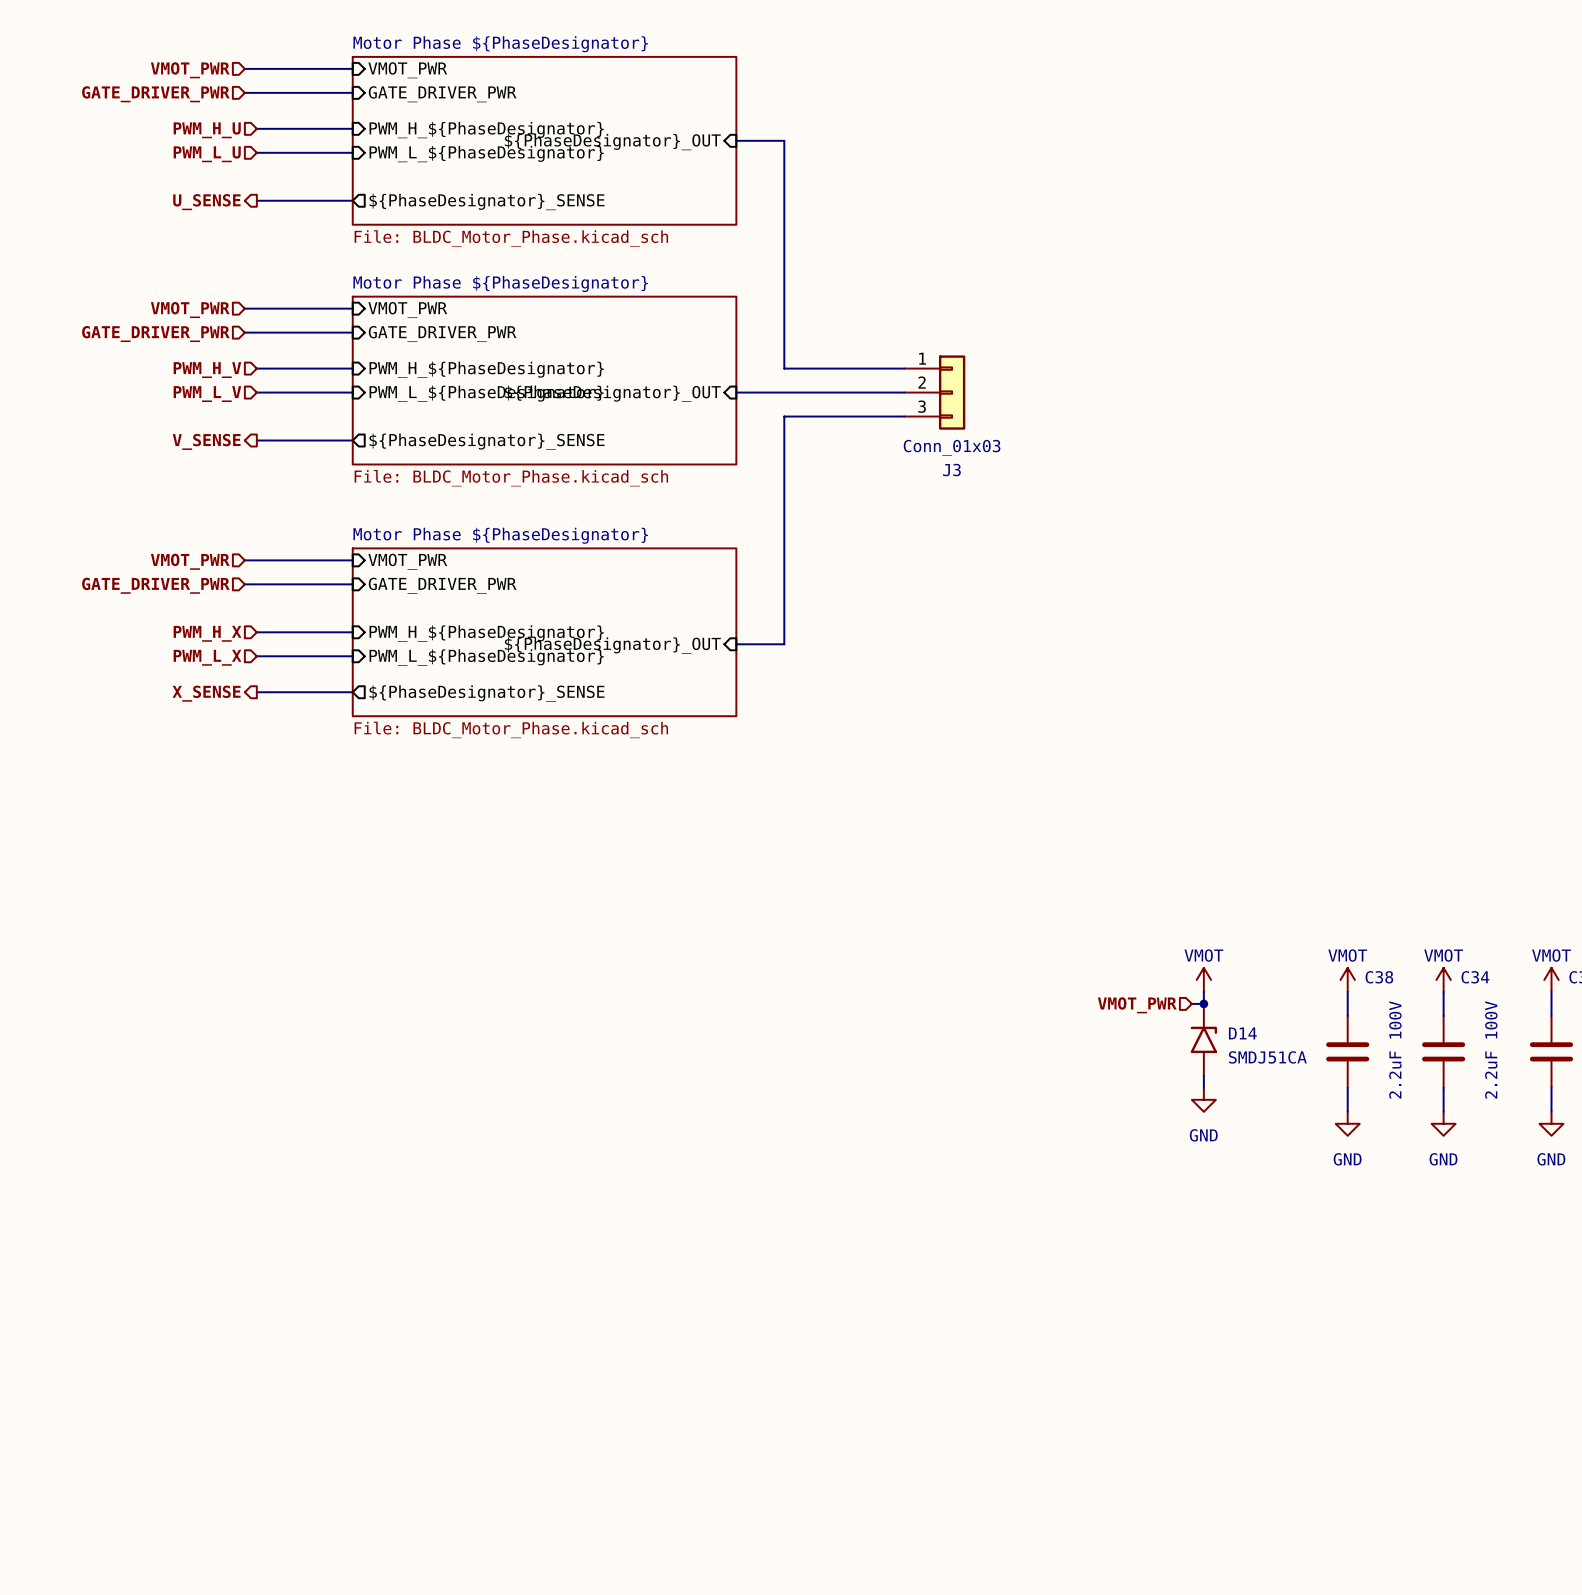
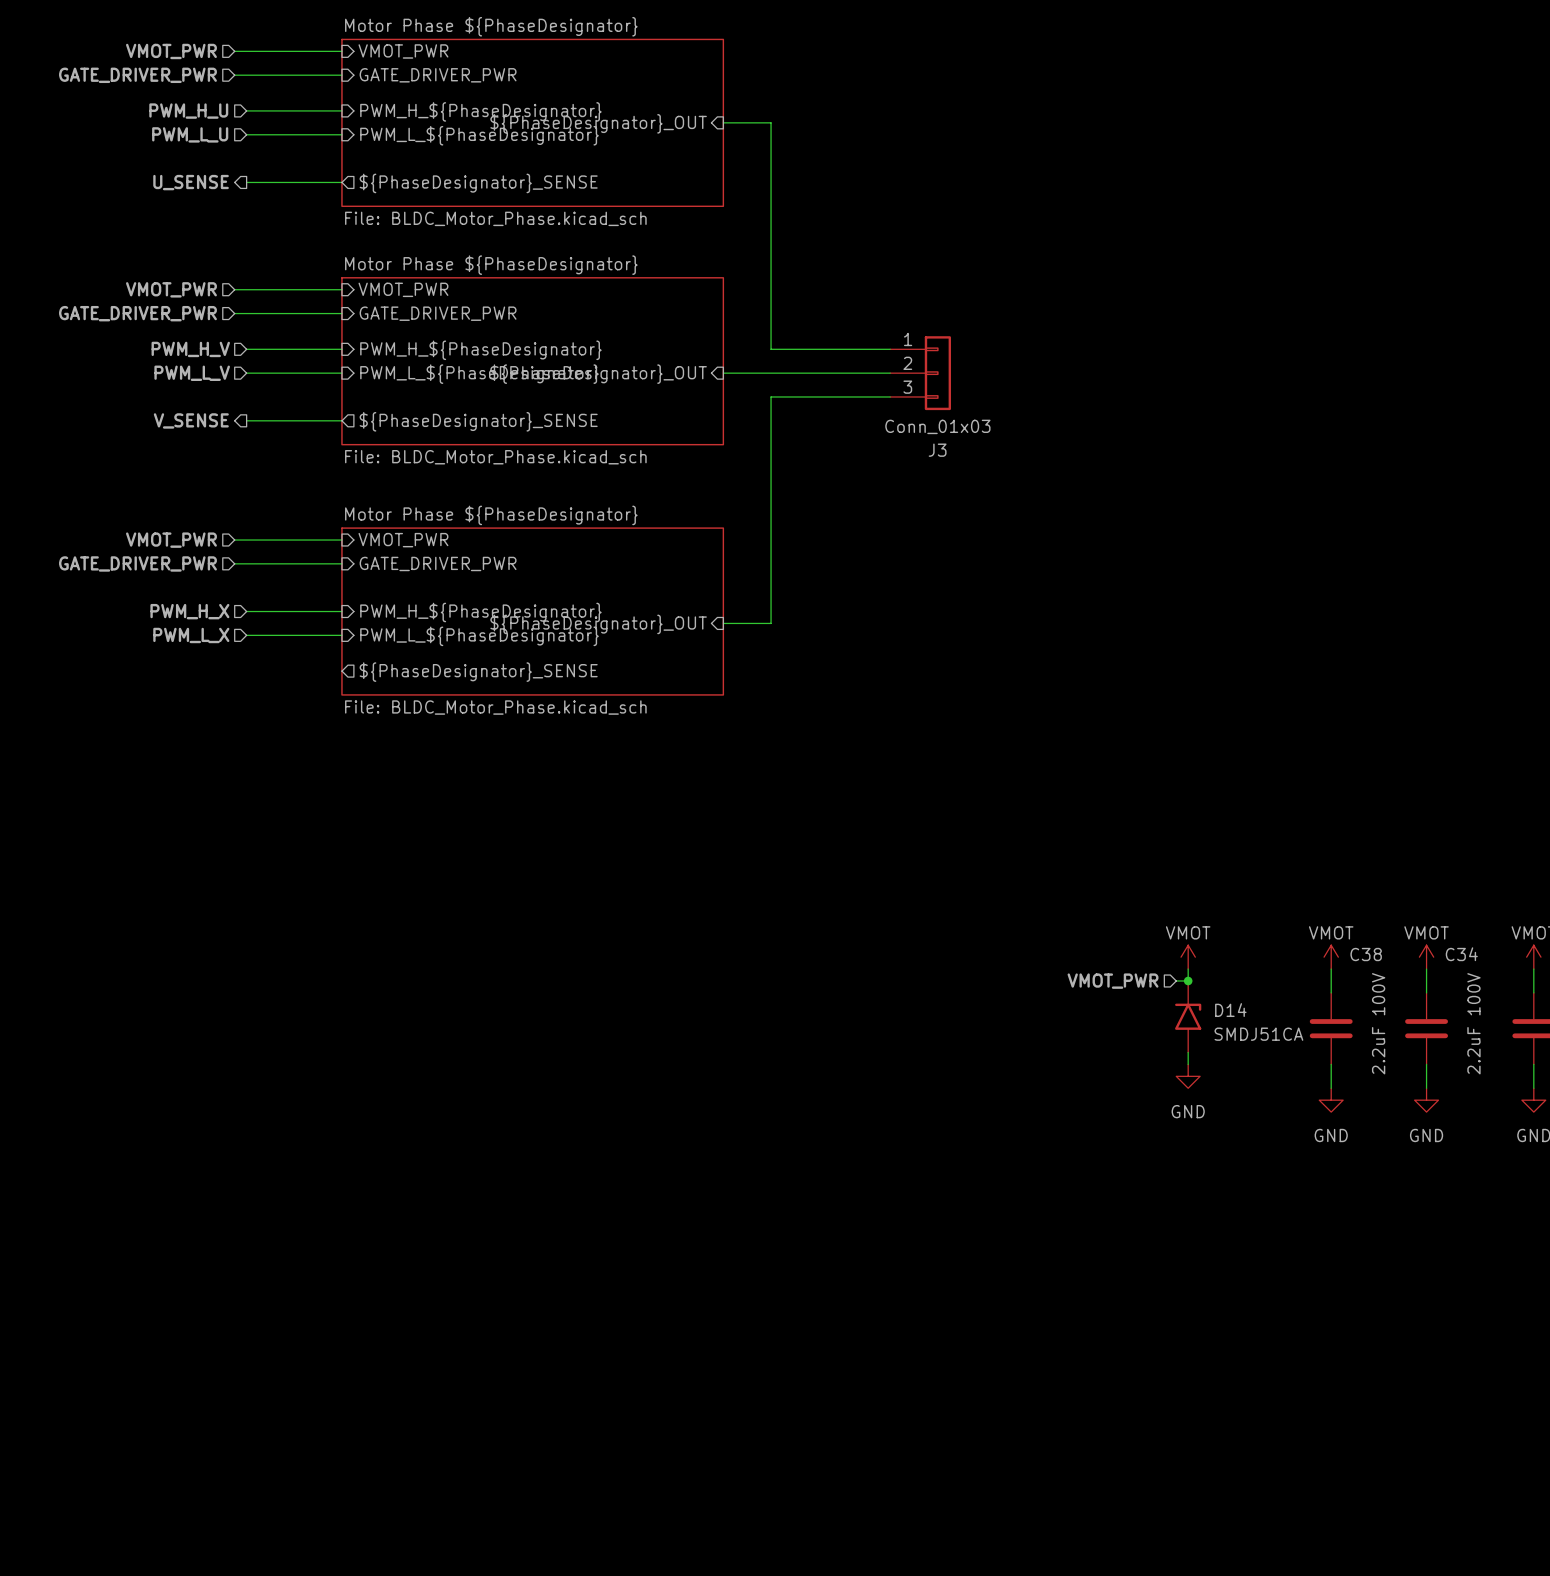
wire: (256, 692) (352, 692) -> none
hierarchical label: X_SENSE (206, 693) -> none

